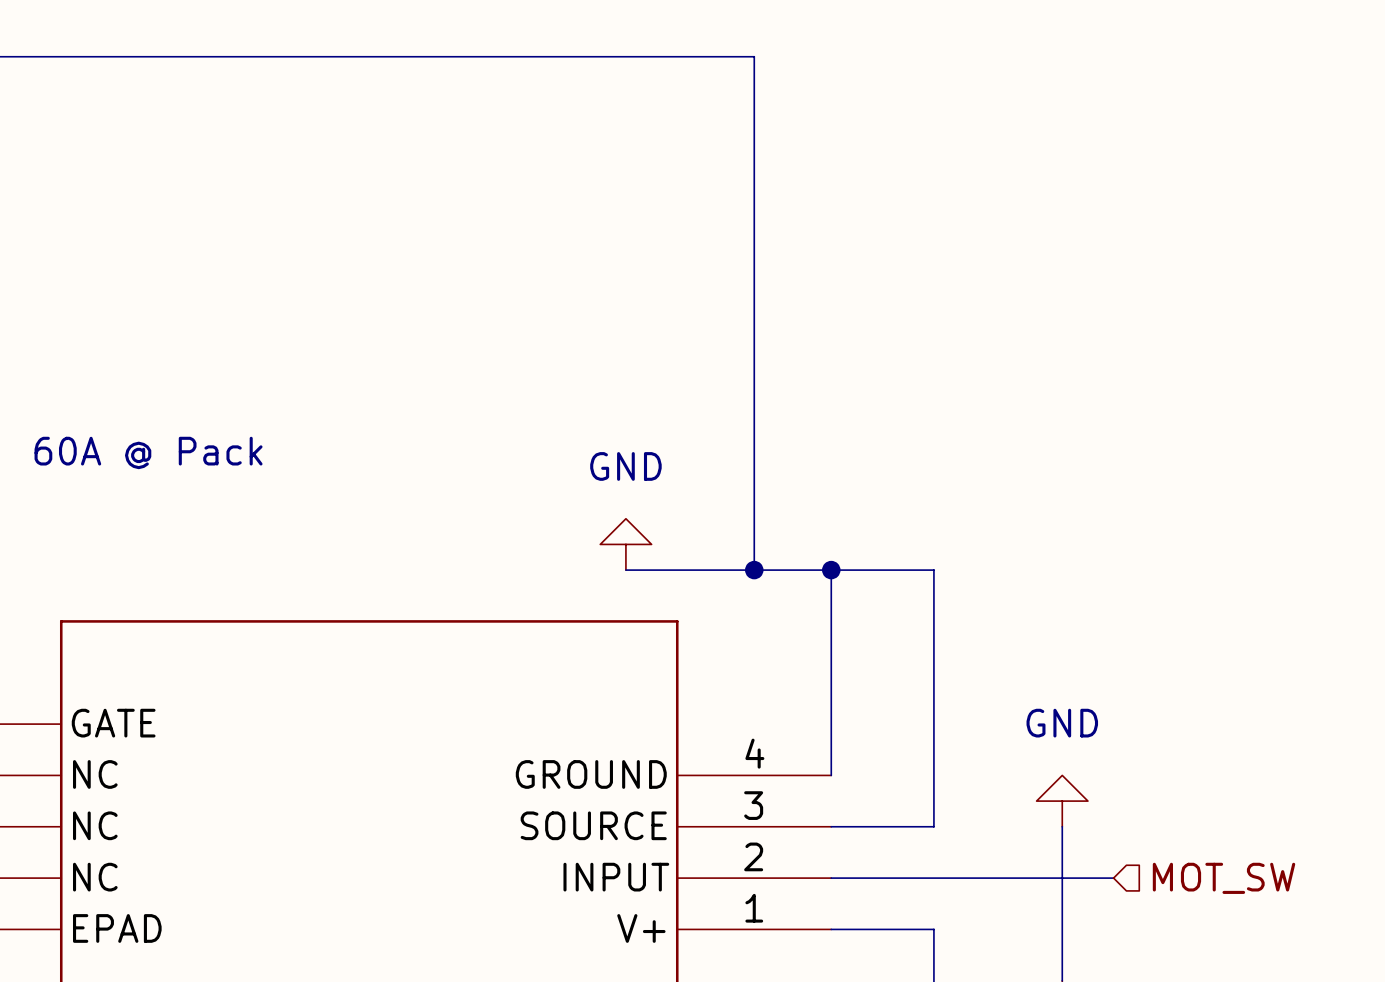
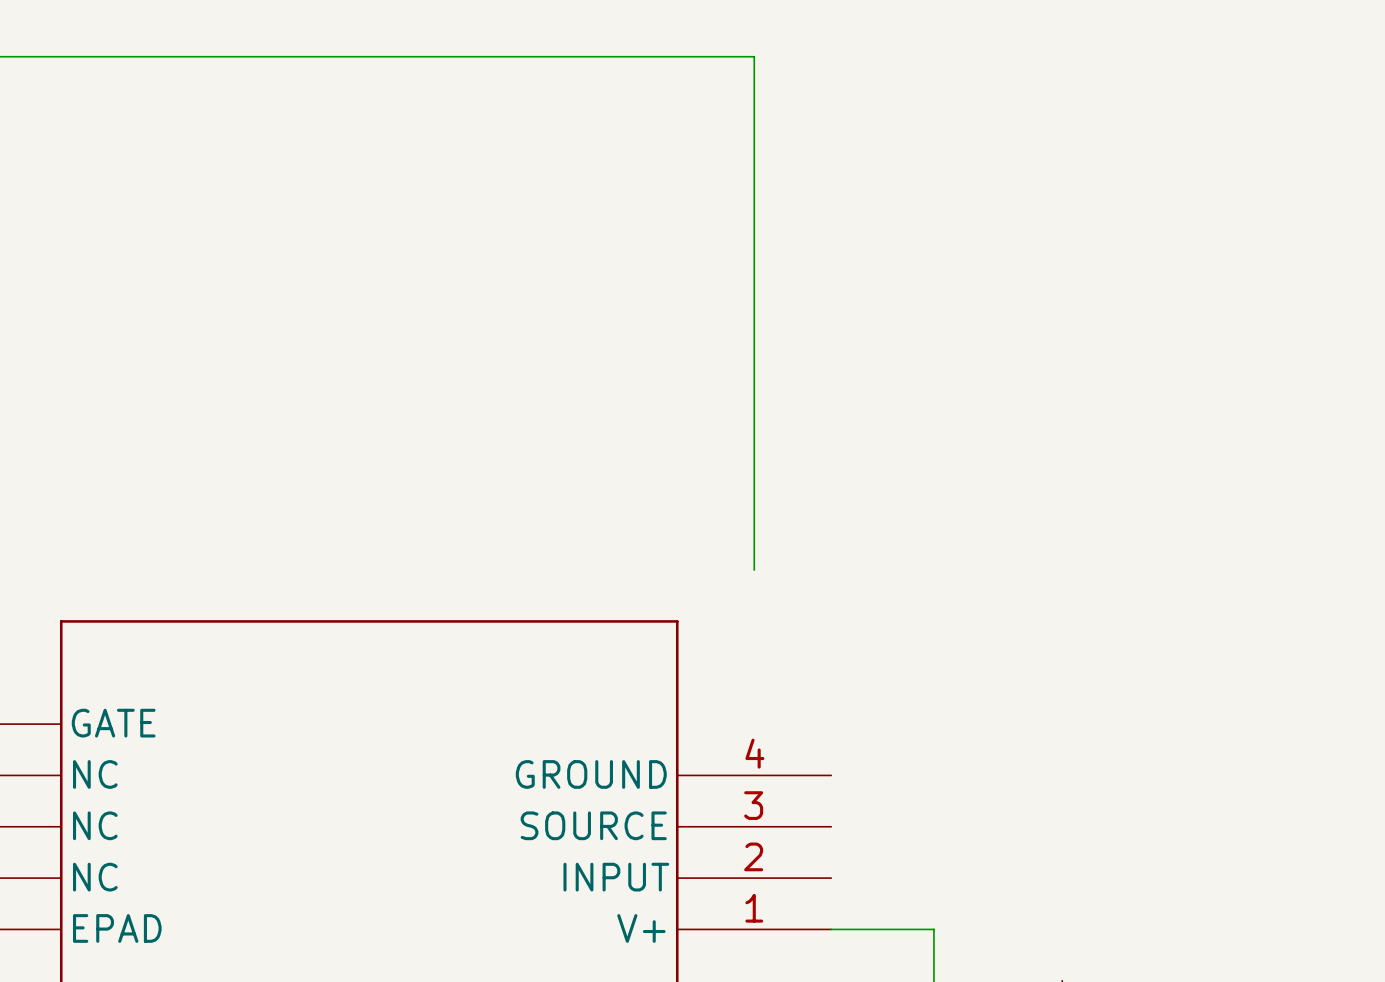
text: 60A @ Pack (148, 452) -> none
power symbol: GND (625, 544) -> none
wire: (625, 570) (933, 570) (933, 826) (831, 826) -> none
junction: (754, 570) -> none
wire: (831, 570) (831, 775) -> none
junction: (831, 570) -> none
power symbol: GND (1062, 801) -> none
wire: (1062, 826) (1062, 980) -> none
wire: (831, 878) (1113, 878) -> none
hierarchical label: MOT_SW (1224, 878) -> none

